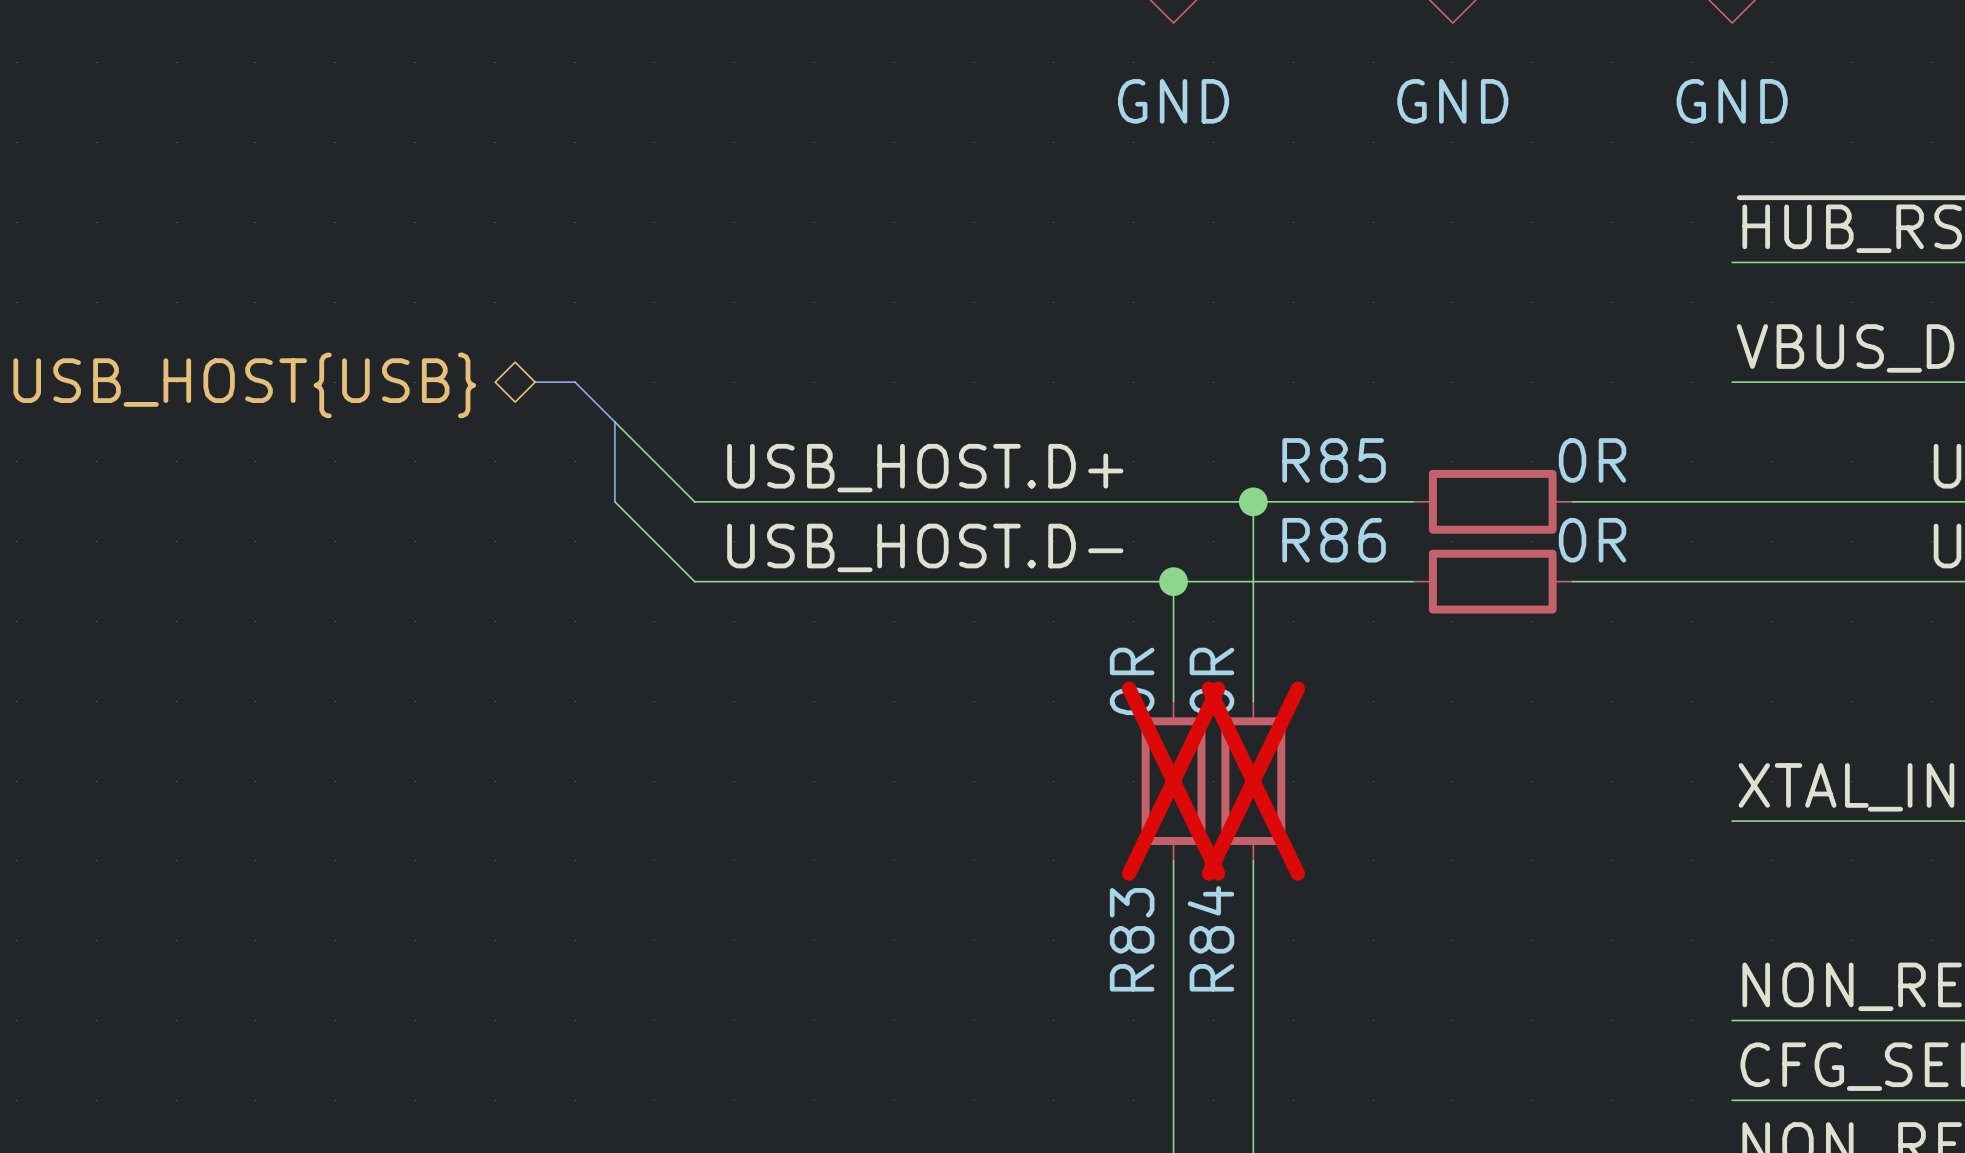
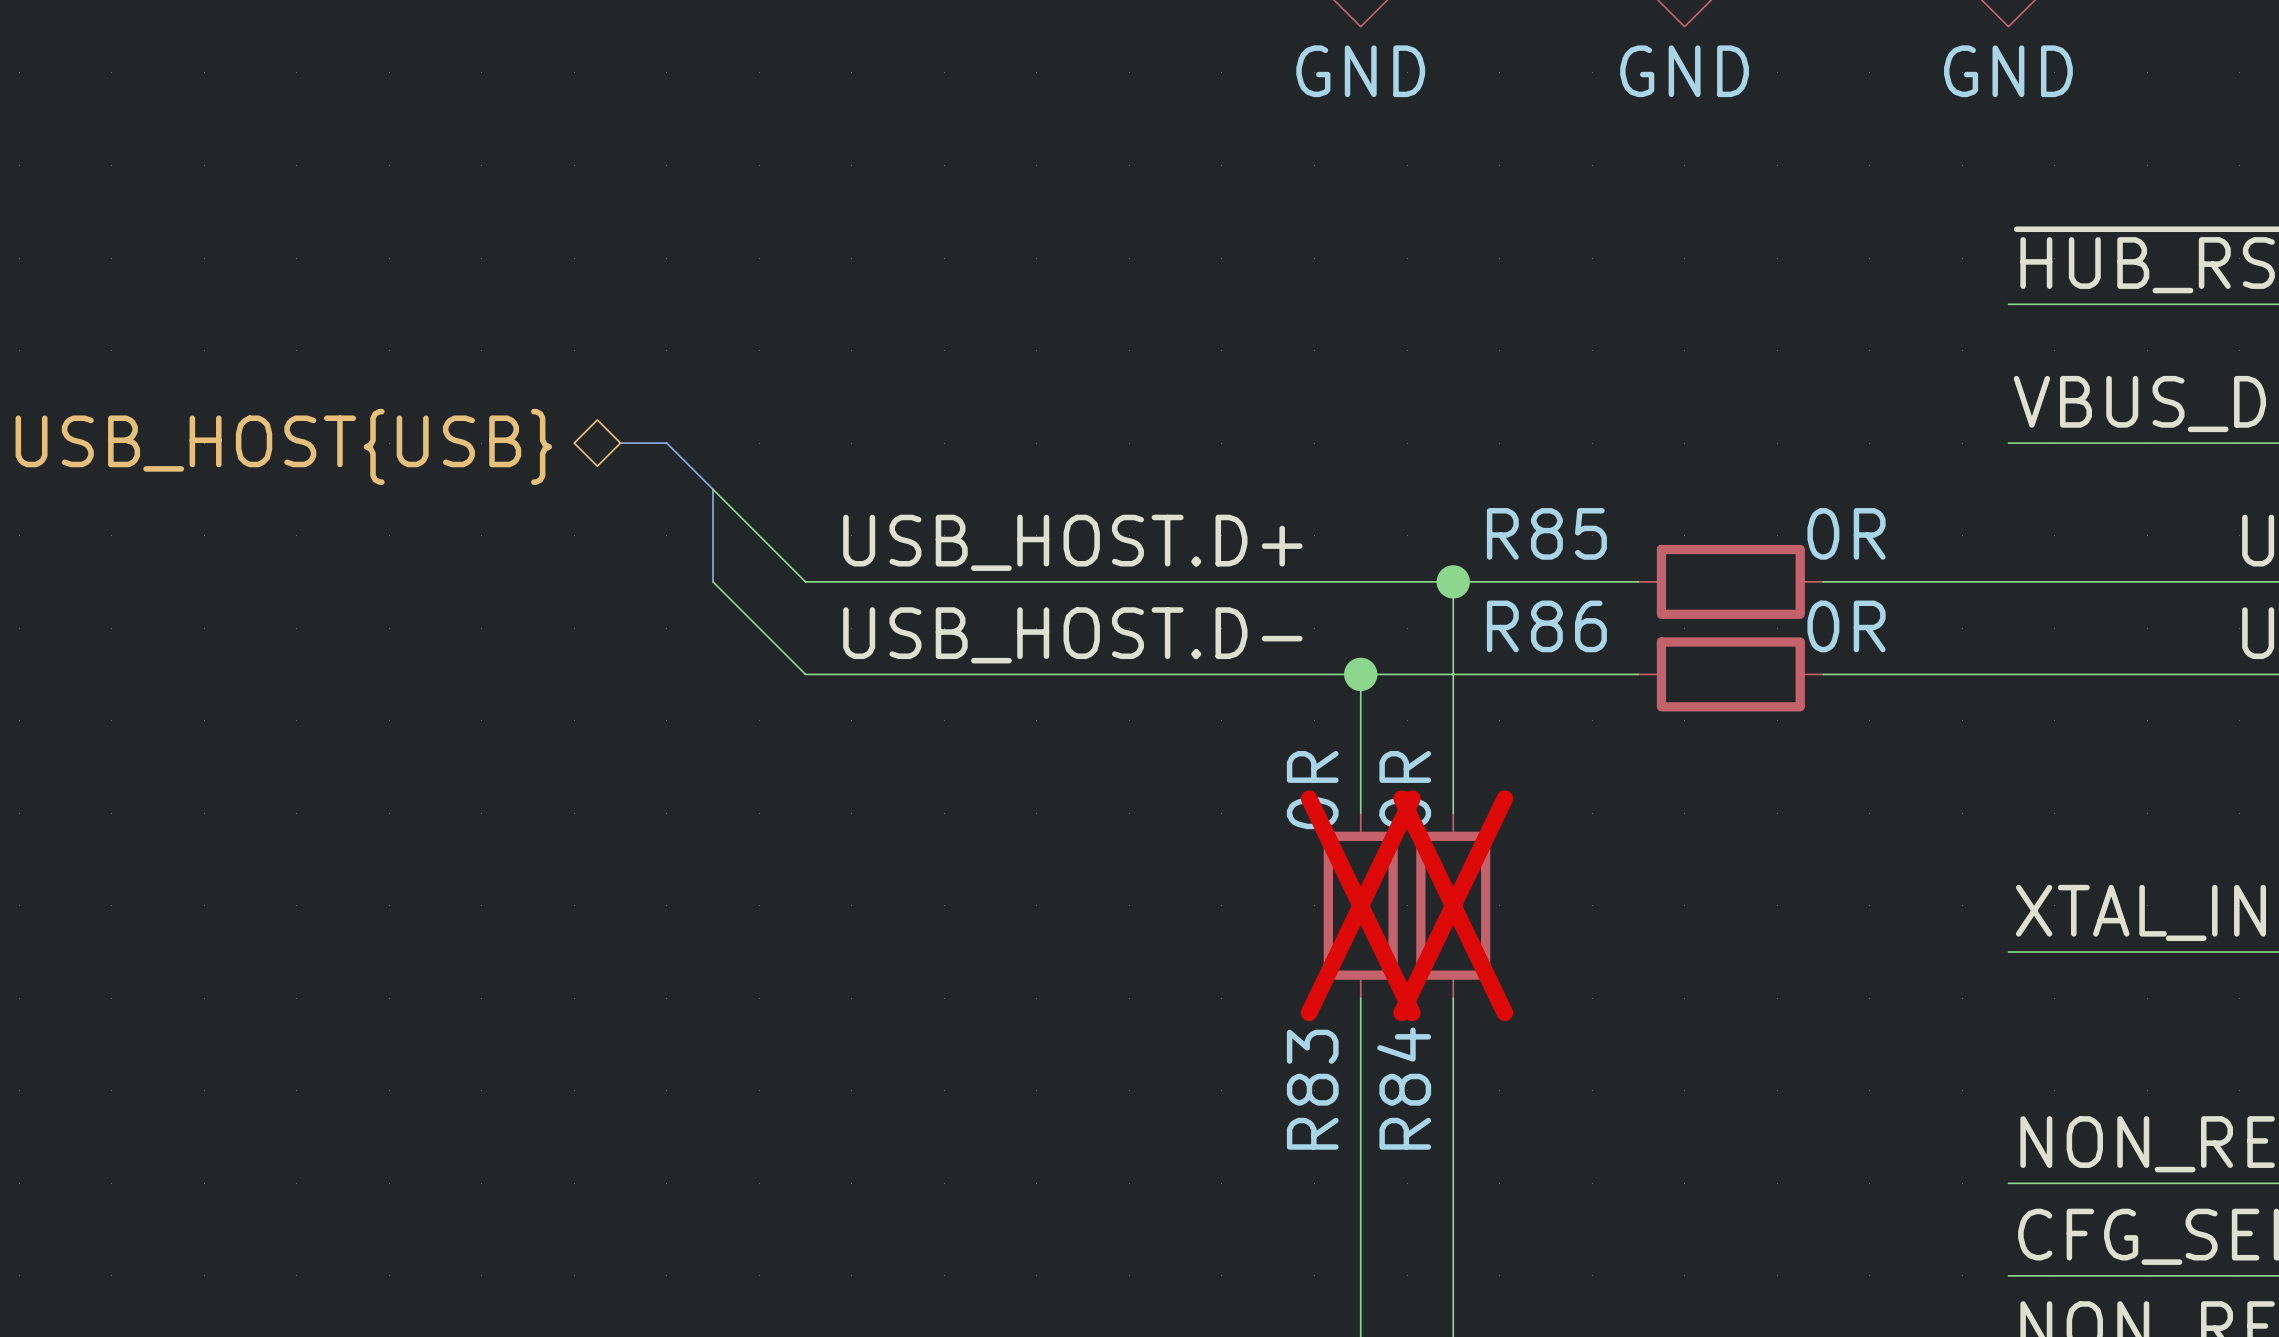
power symbol text position: GND (1173, 101) -> GND (1360, 71)
power symbol text position: GND (1452, 101) -> GND (1684, 71)
power symbol text position: GND (1732, 101) -> GND (2008, 71)

